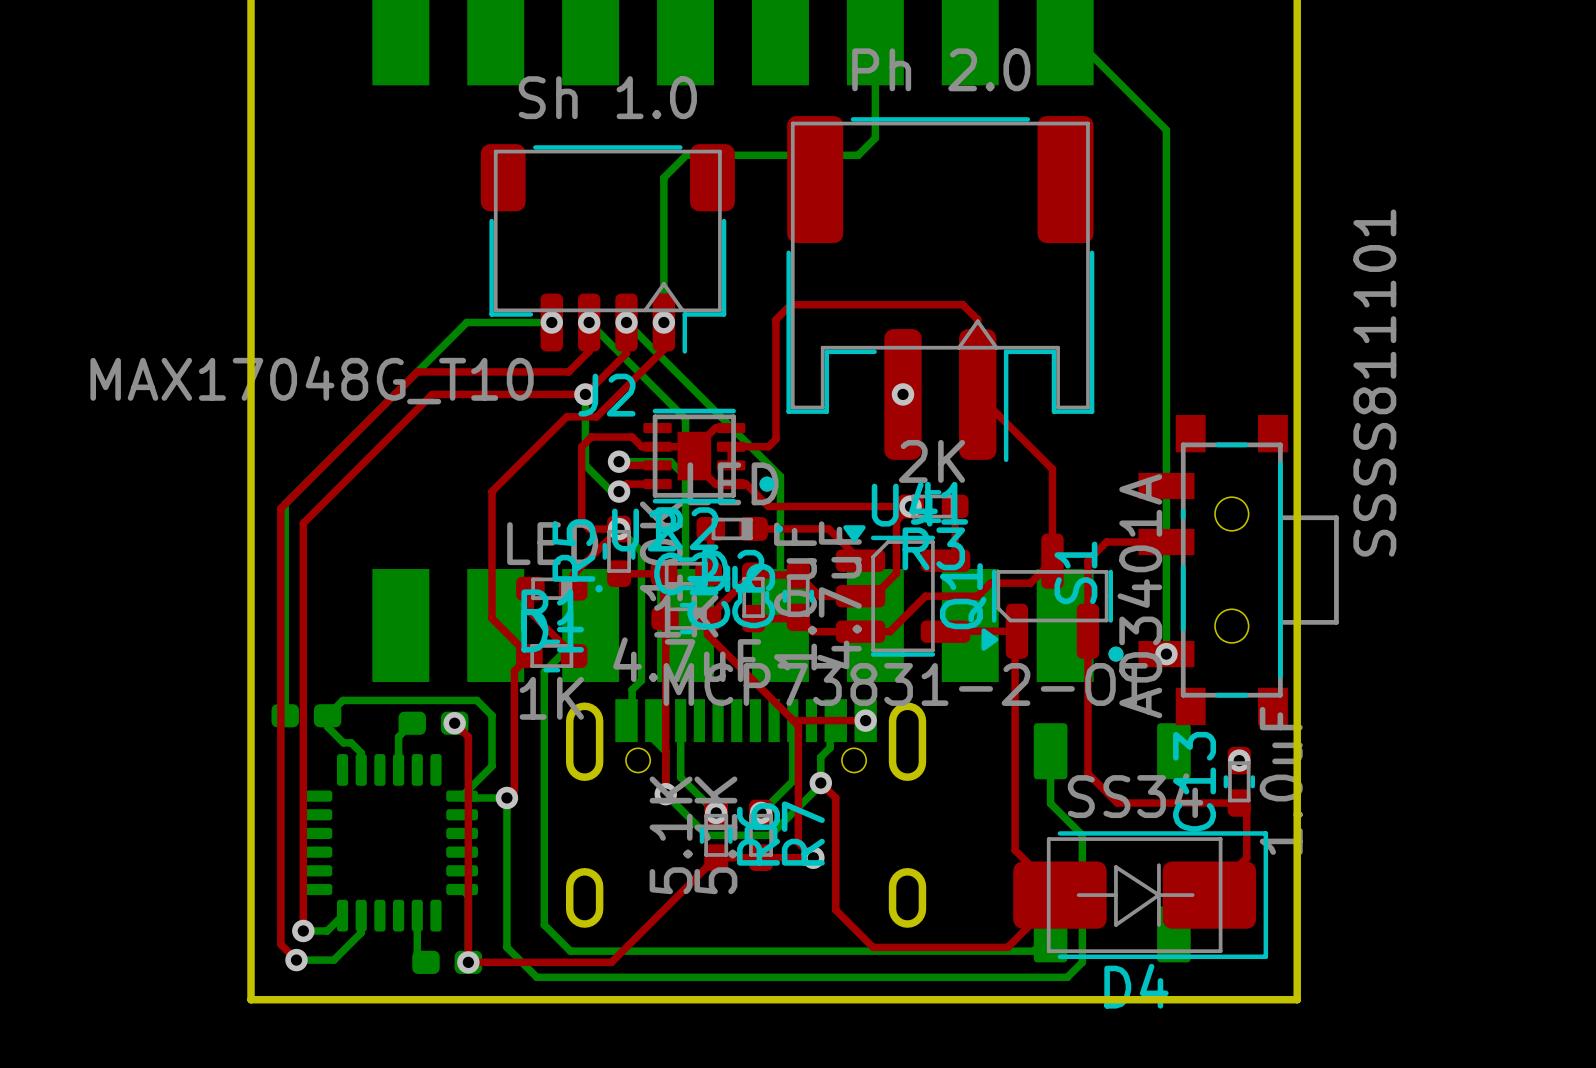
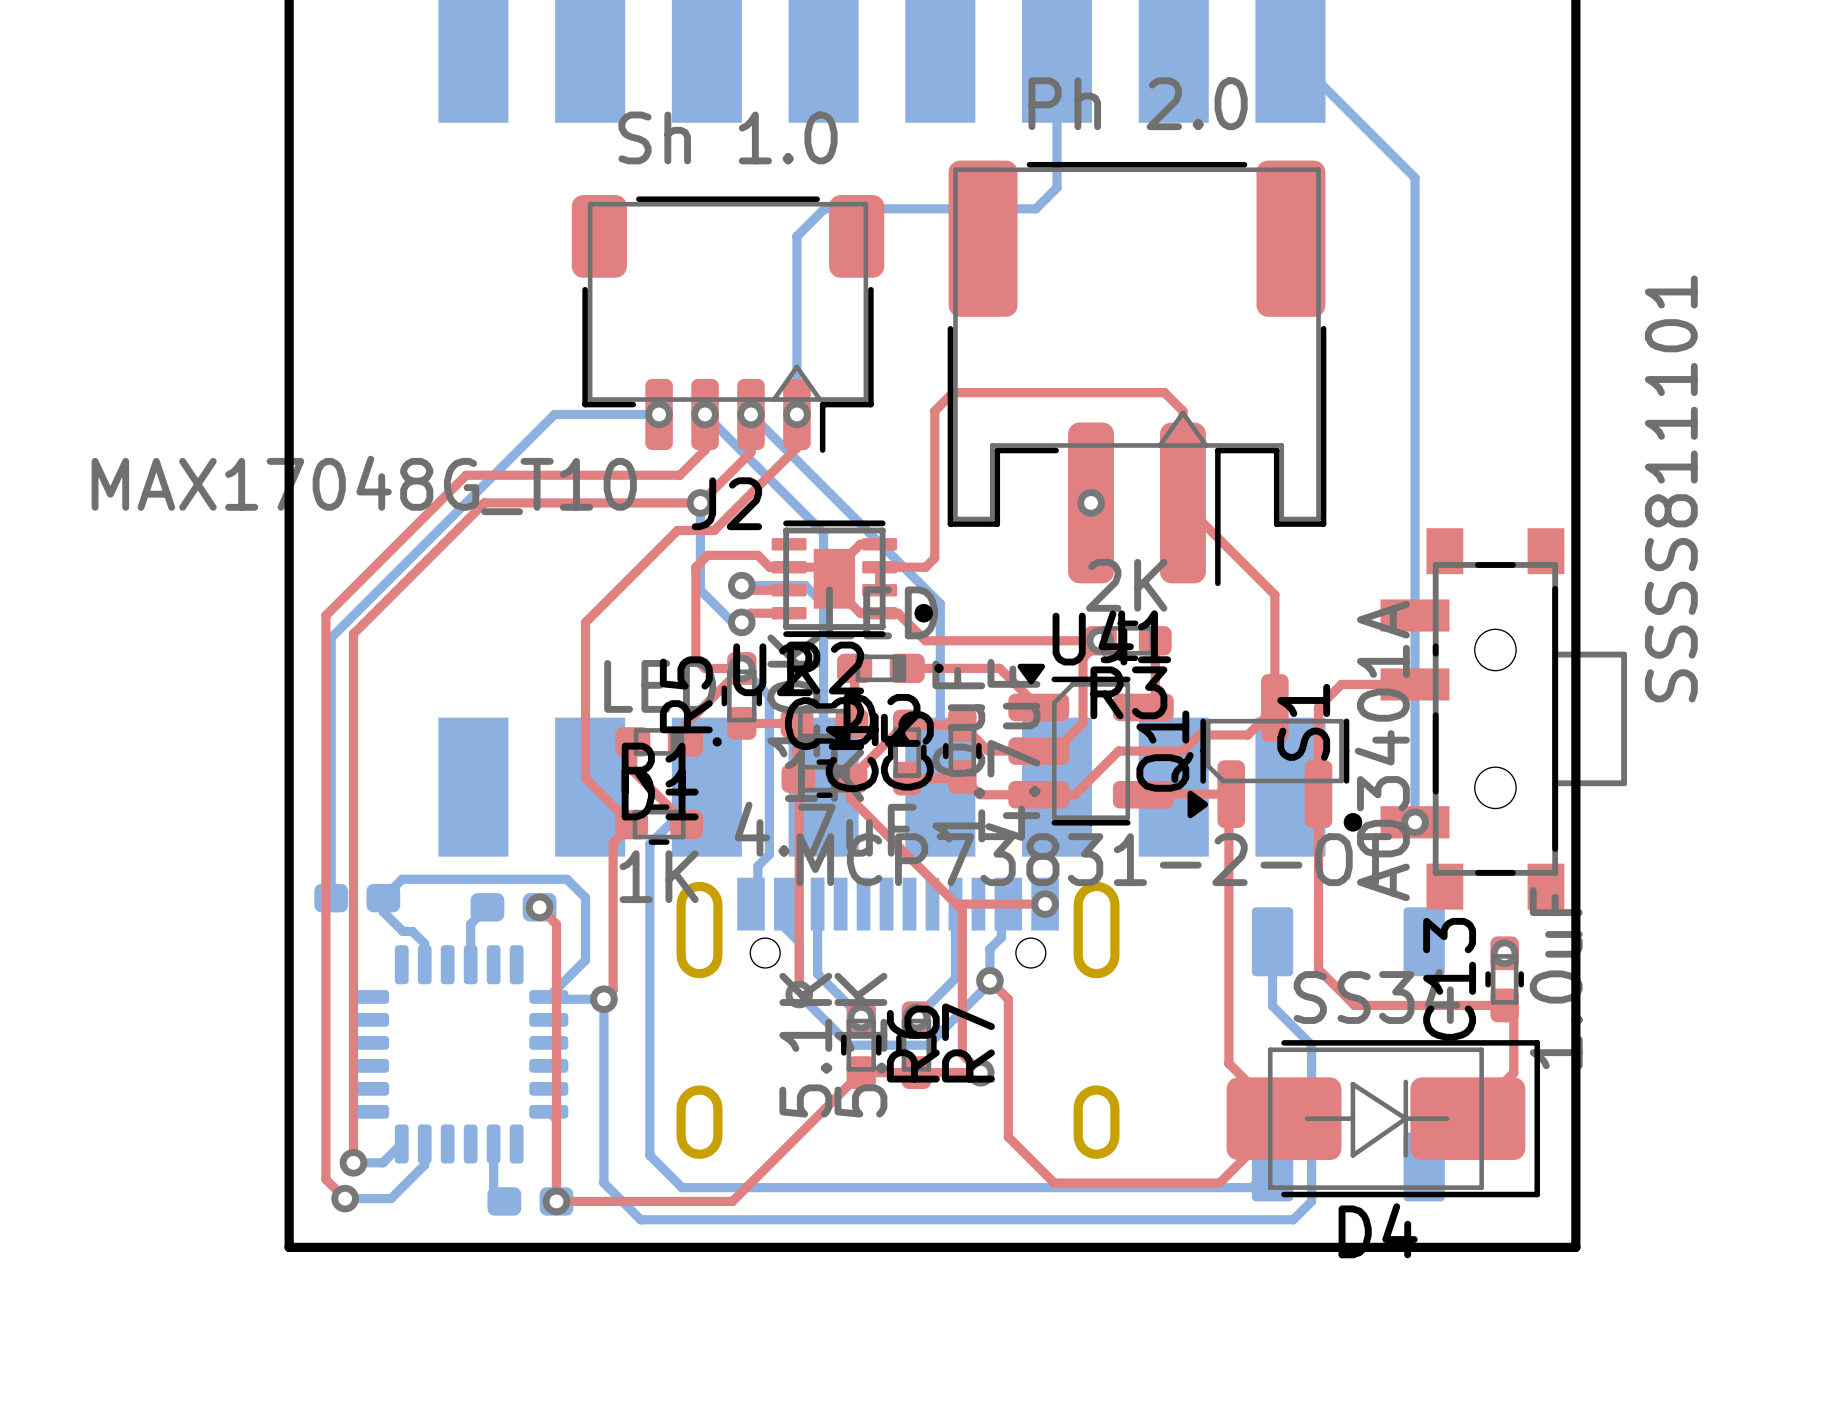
top track: (417, 371) (280, 508) -> (493, 475) (466, 475) (325, 615) (325, 643)
top track: (432, 394) (303, 523) -> (512, 502) (484, 502) (353, 633) (353, 661)

